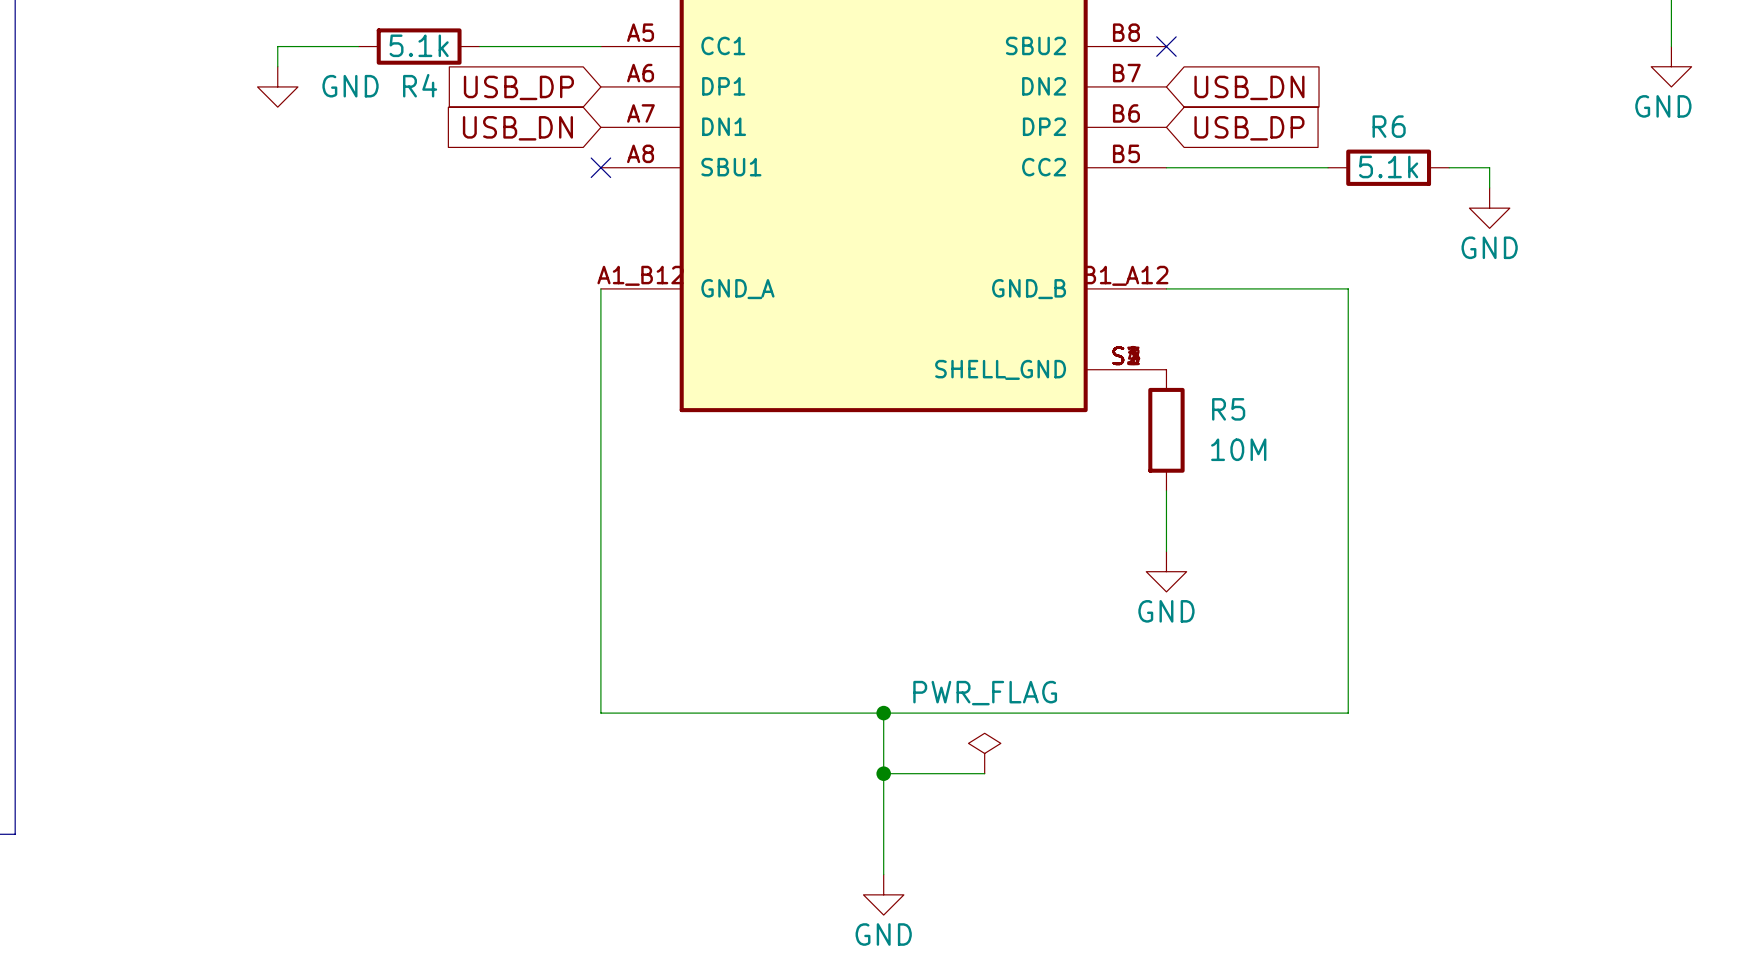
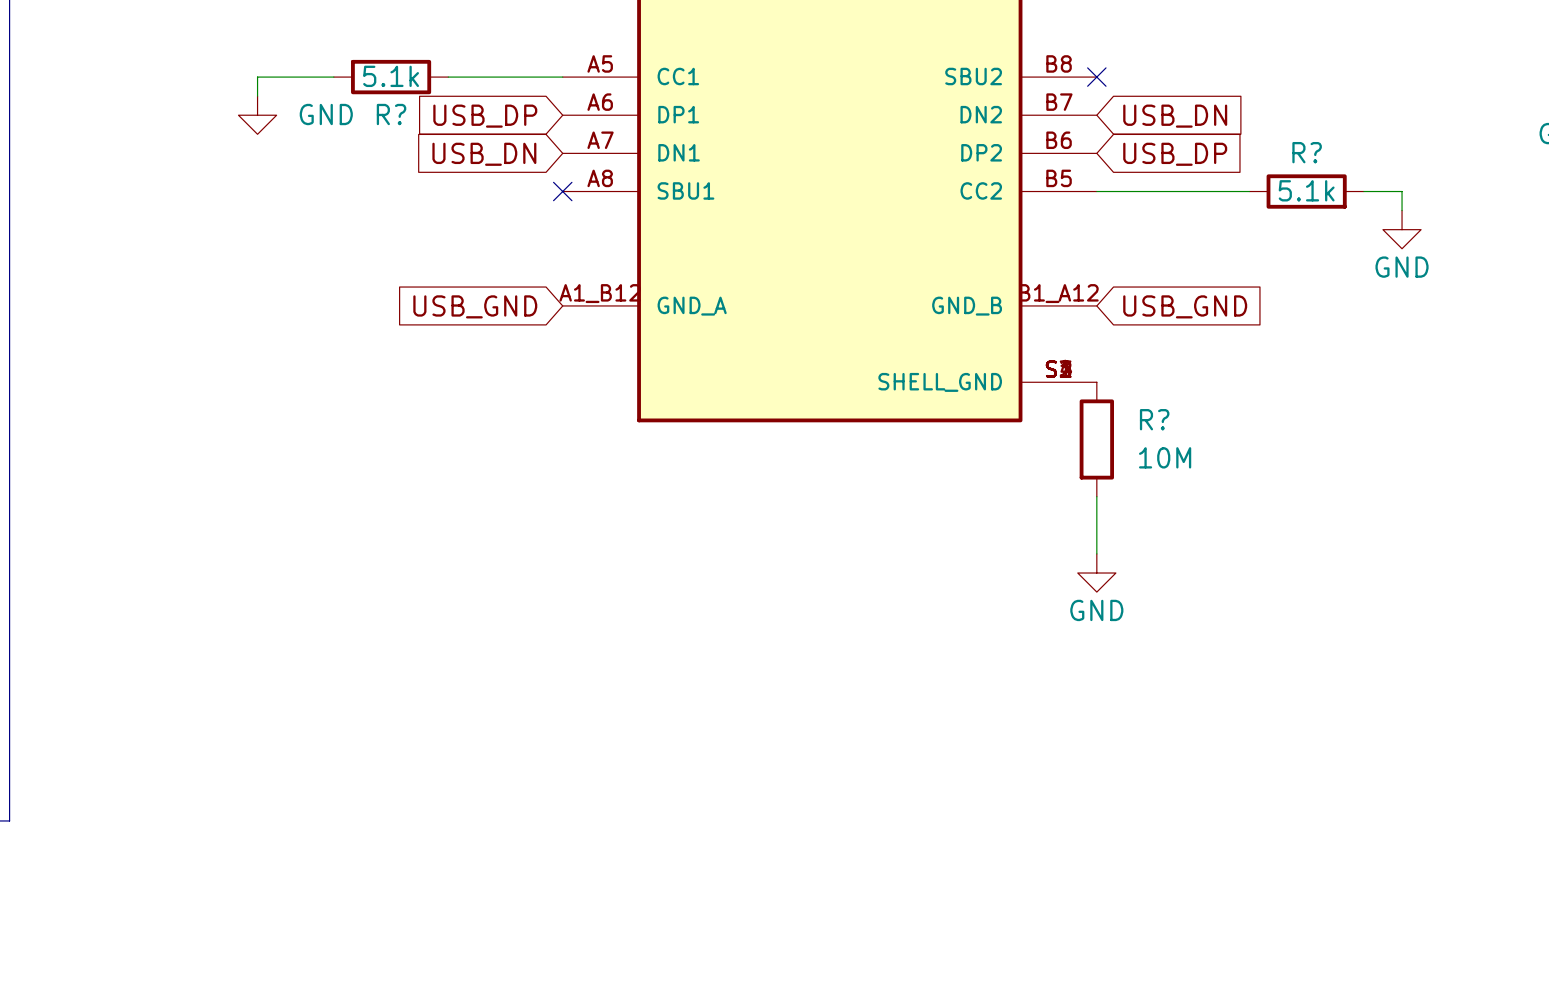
R4 name: R4 (420, 85) -> R? (391, 114)
R6 name: R6 (1389, 126) -> R? (1307, 152)
wire: (600, 288) (600, 713) (1348, 713) (1348, 288) (1166, 288) -> none
global label: none -> USB_GND (475, 306)
global label: none -> USB_GND (1185, 306)
R5 name: R5 (1228, 409) -> R? (1154, 419)
wire: (883, 713) (883, 874) -> none
junction: (883, 713) -> none
power symbol: PWR_FLAG (984, 753) -> none
wire: (883, 773) (984, 773) -> none
junction: (883, 773) -> none
power symbol: GND (883, 894) -> none

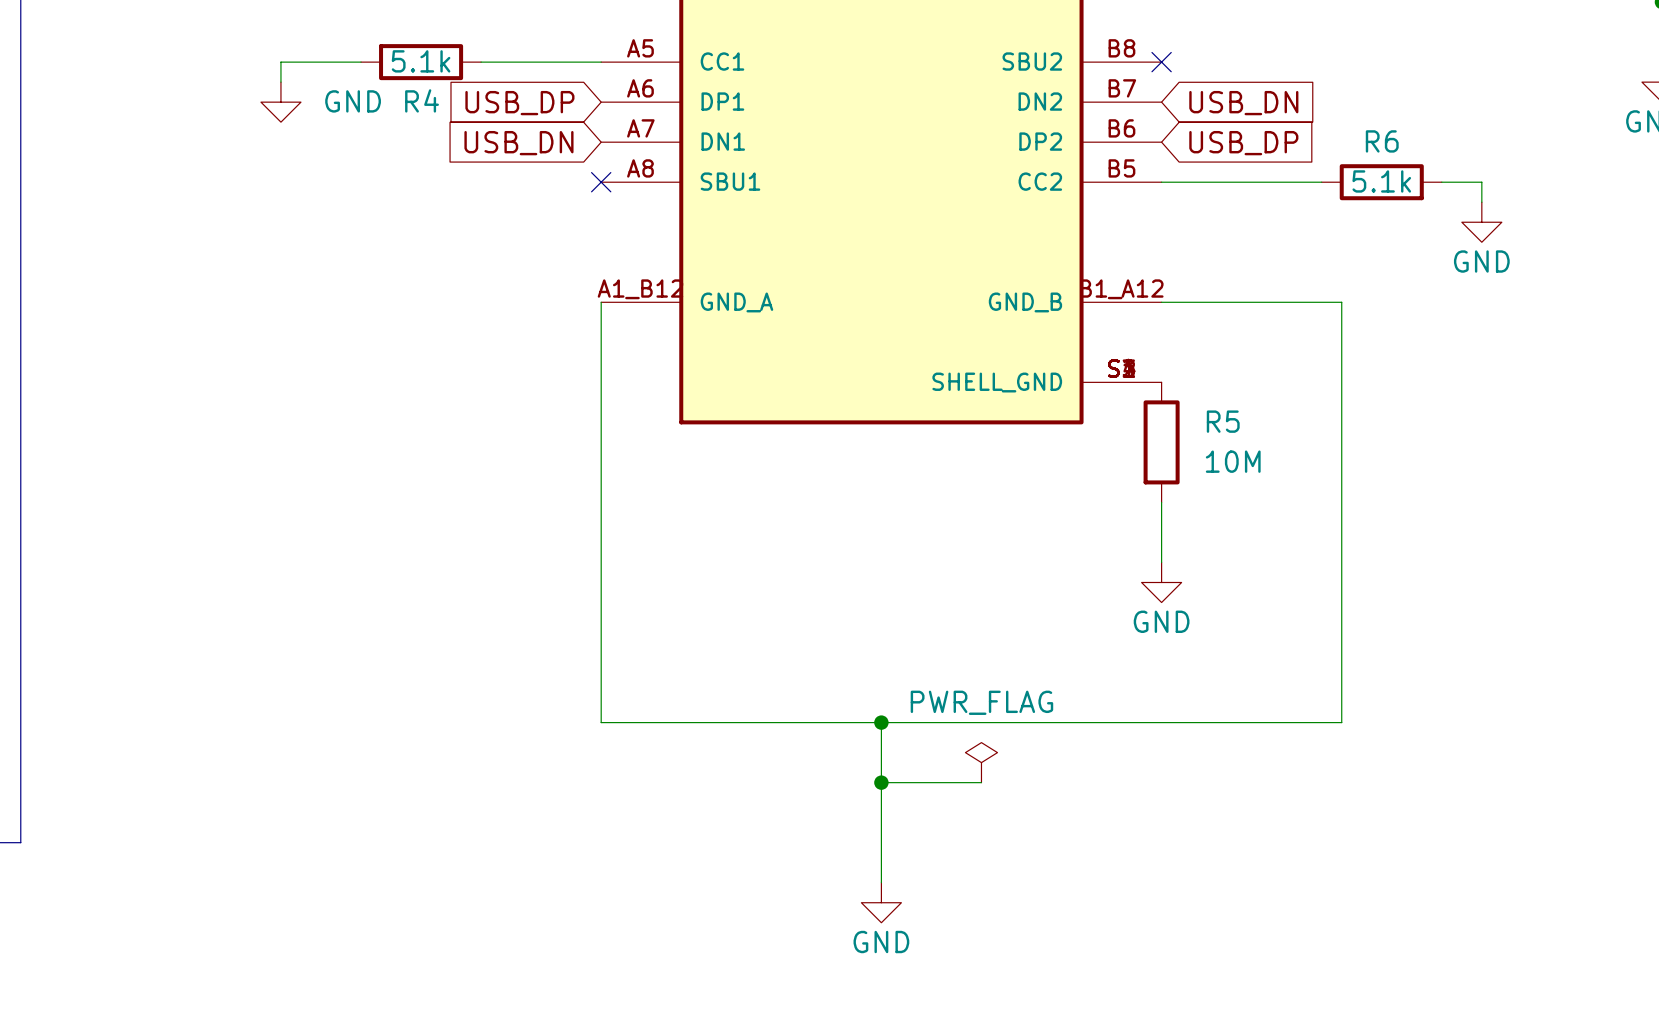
R? name: R? (391, 114) -> R4 (422, 100)
R? name: R? (1307, 152) -> R6 (1382, 141)
wire: none -> (601, 302) (601, 722) (1341, 722) (1341, 302) (1161, 302)
global label: USB_GND (475, 306) -> none
global label: USB_GND (1185, 306) -> none
R? name: R? (1154, 419) -> R5 (1223, 421)
wire: none -> (881, 722) (881, 882)
junction: none -> (881, 722)
power symbol: none -> PWR_FLAG (981, 762)
wire: none -> (881, 782) (981, 782)
junction: none -> (881, 782)
power symbol: none -> GND (881, 902)

